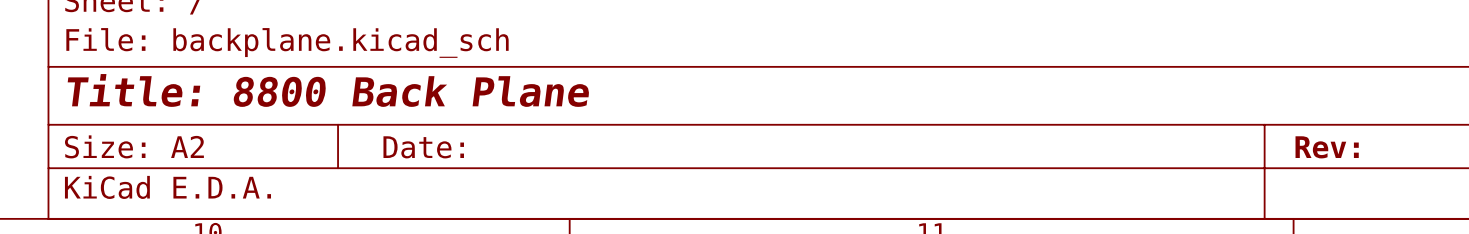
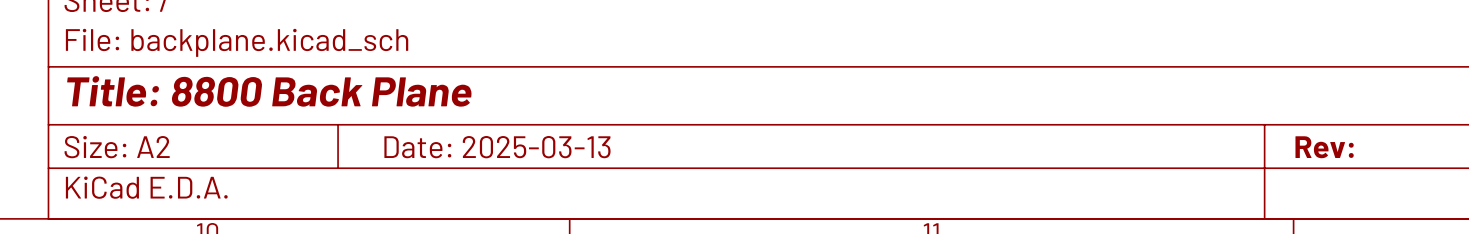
title block: Date: (423, 147) -> Date: 2025-03-13 (497, 147)

